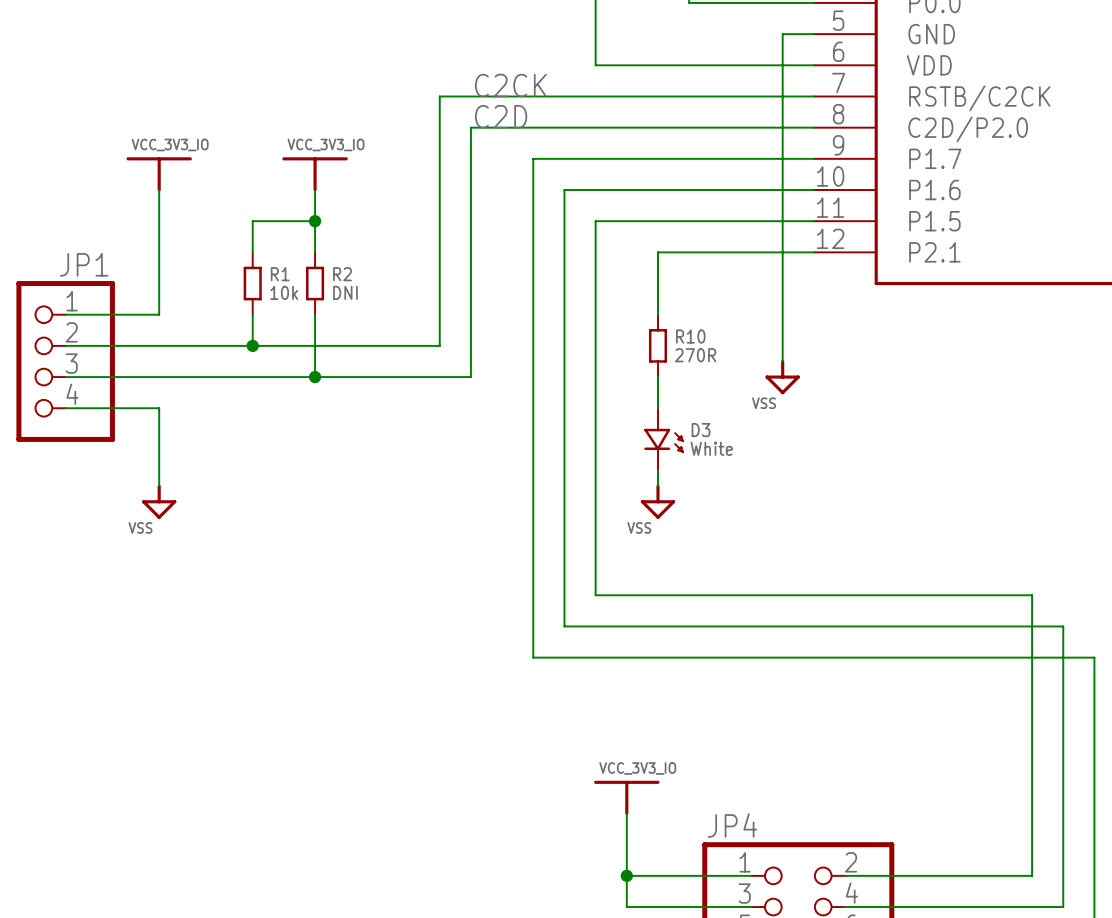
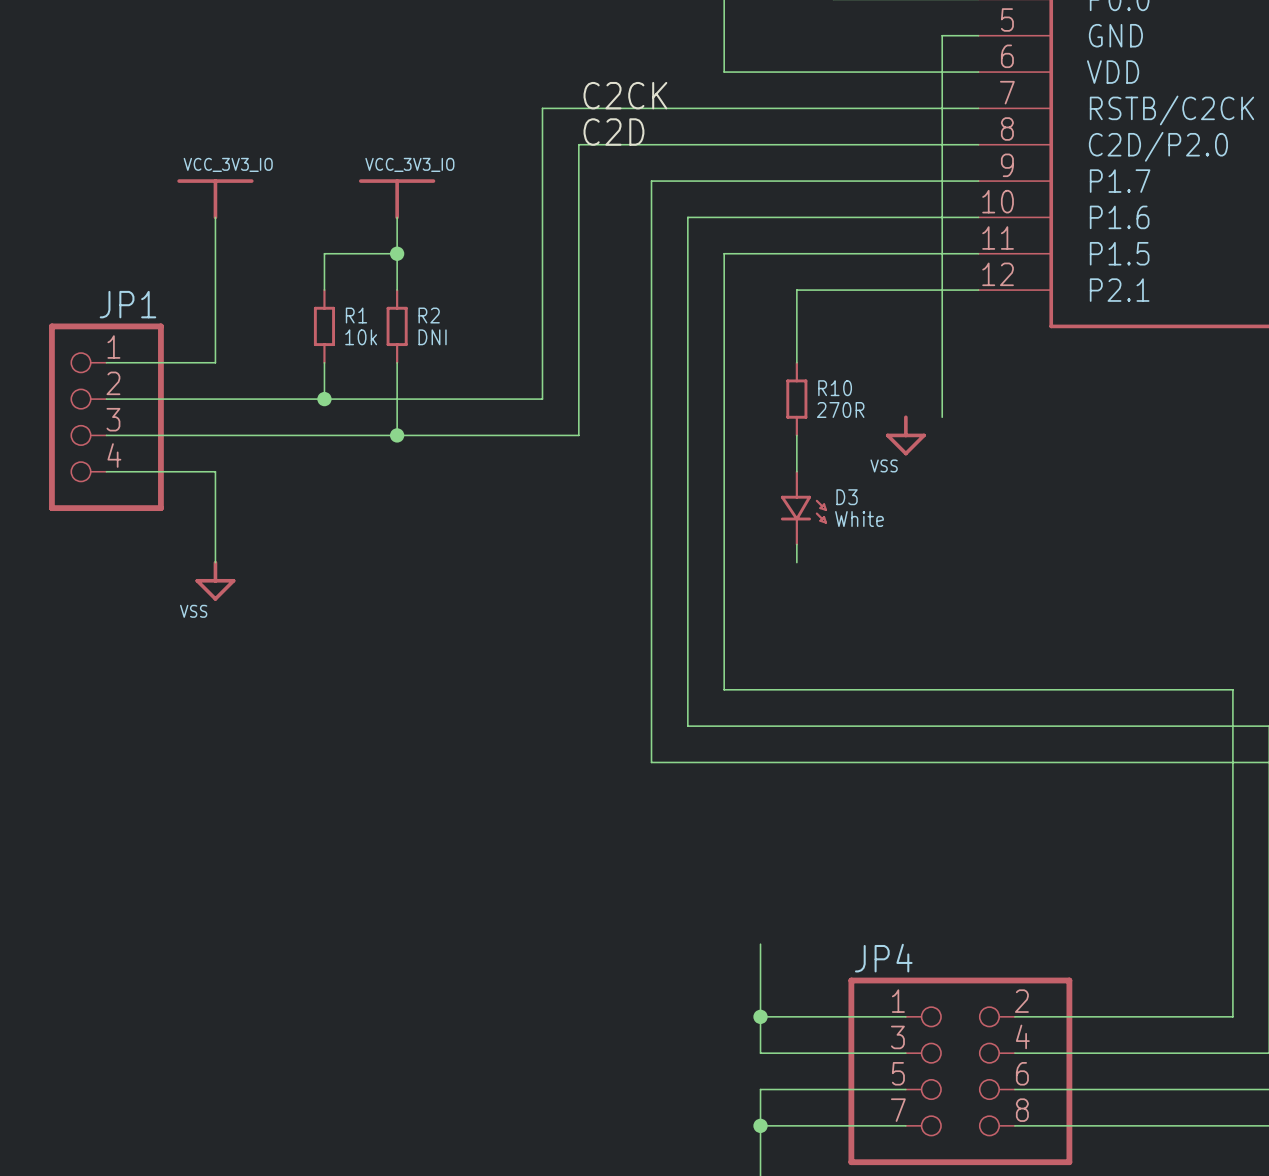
power symbol position: VSS (782, 377) -> VSS (905, 435)
power symbol: VSS (657, 501) -> none
power symbol: VCC_3V3_IO (626, 797) -> none

